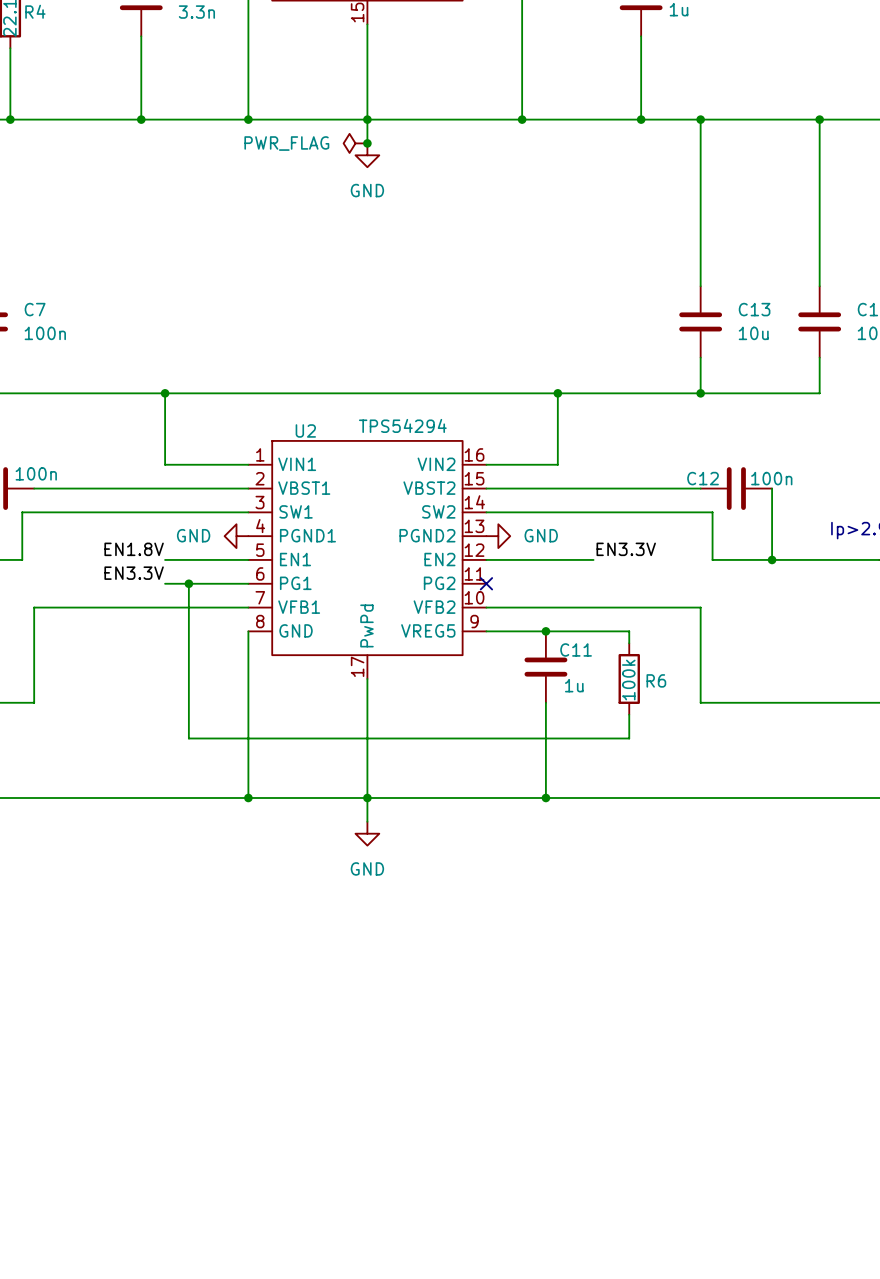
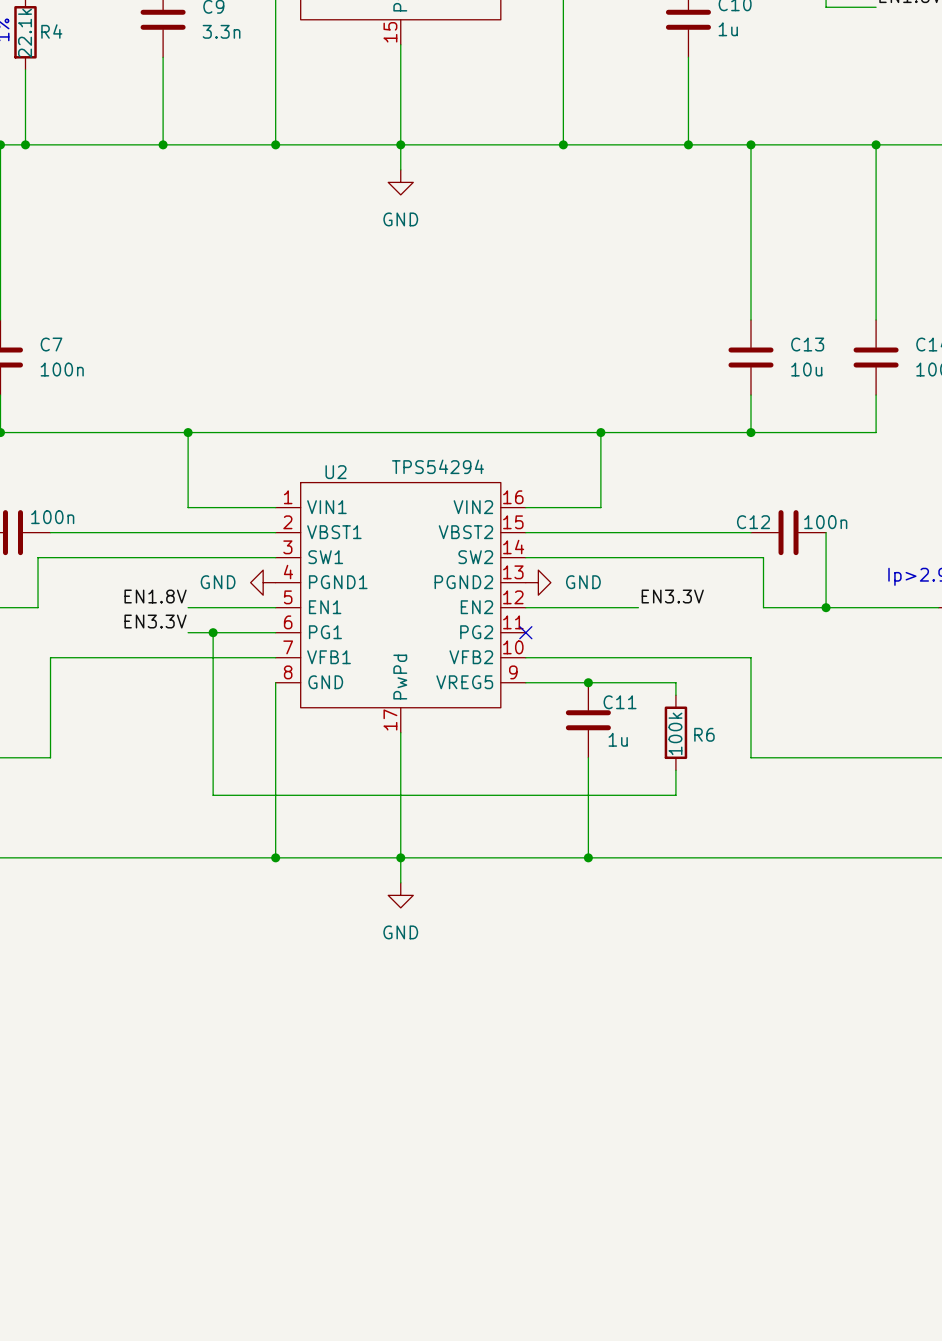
power symbol: PWR_FLAG (355, 143) -> none
junction: (367, 143) -> none

